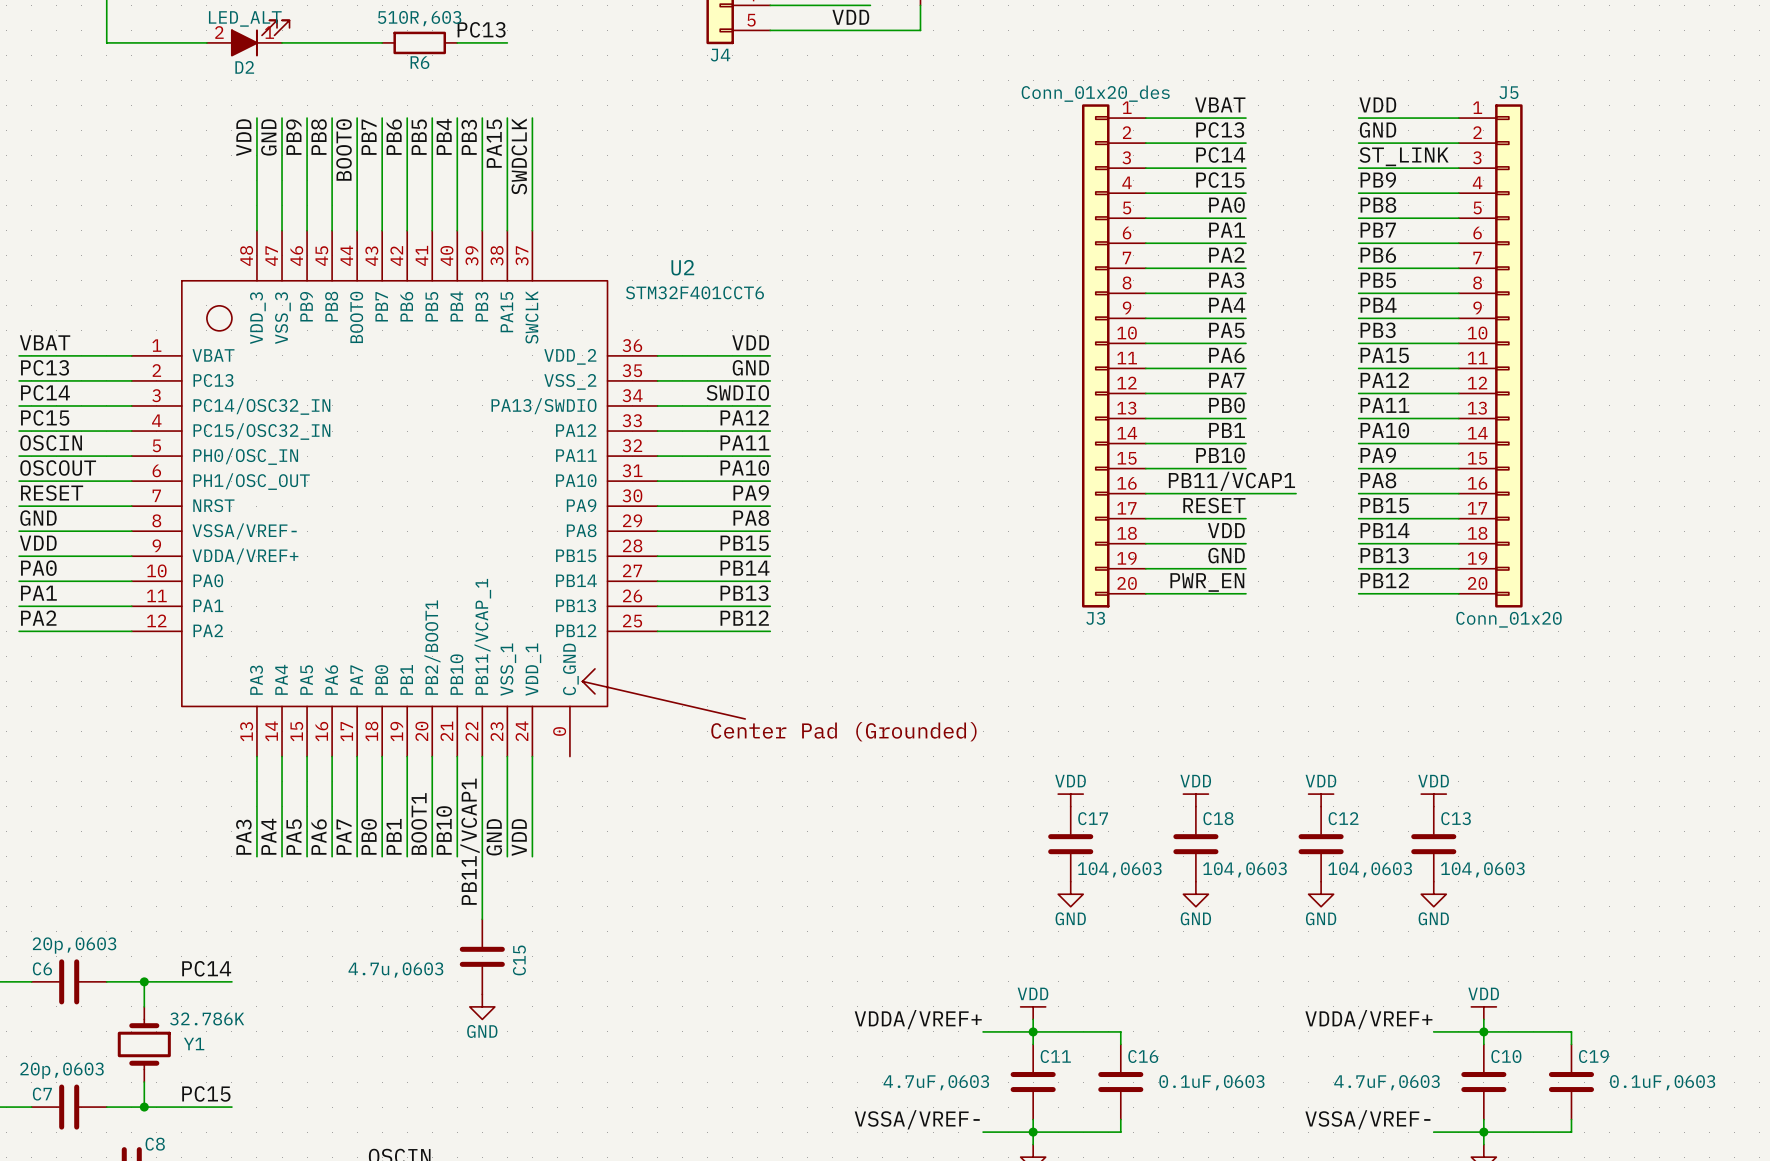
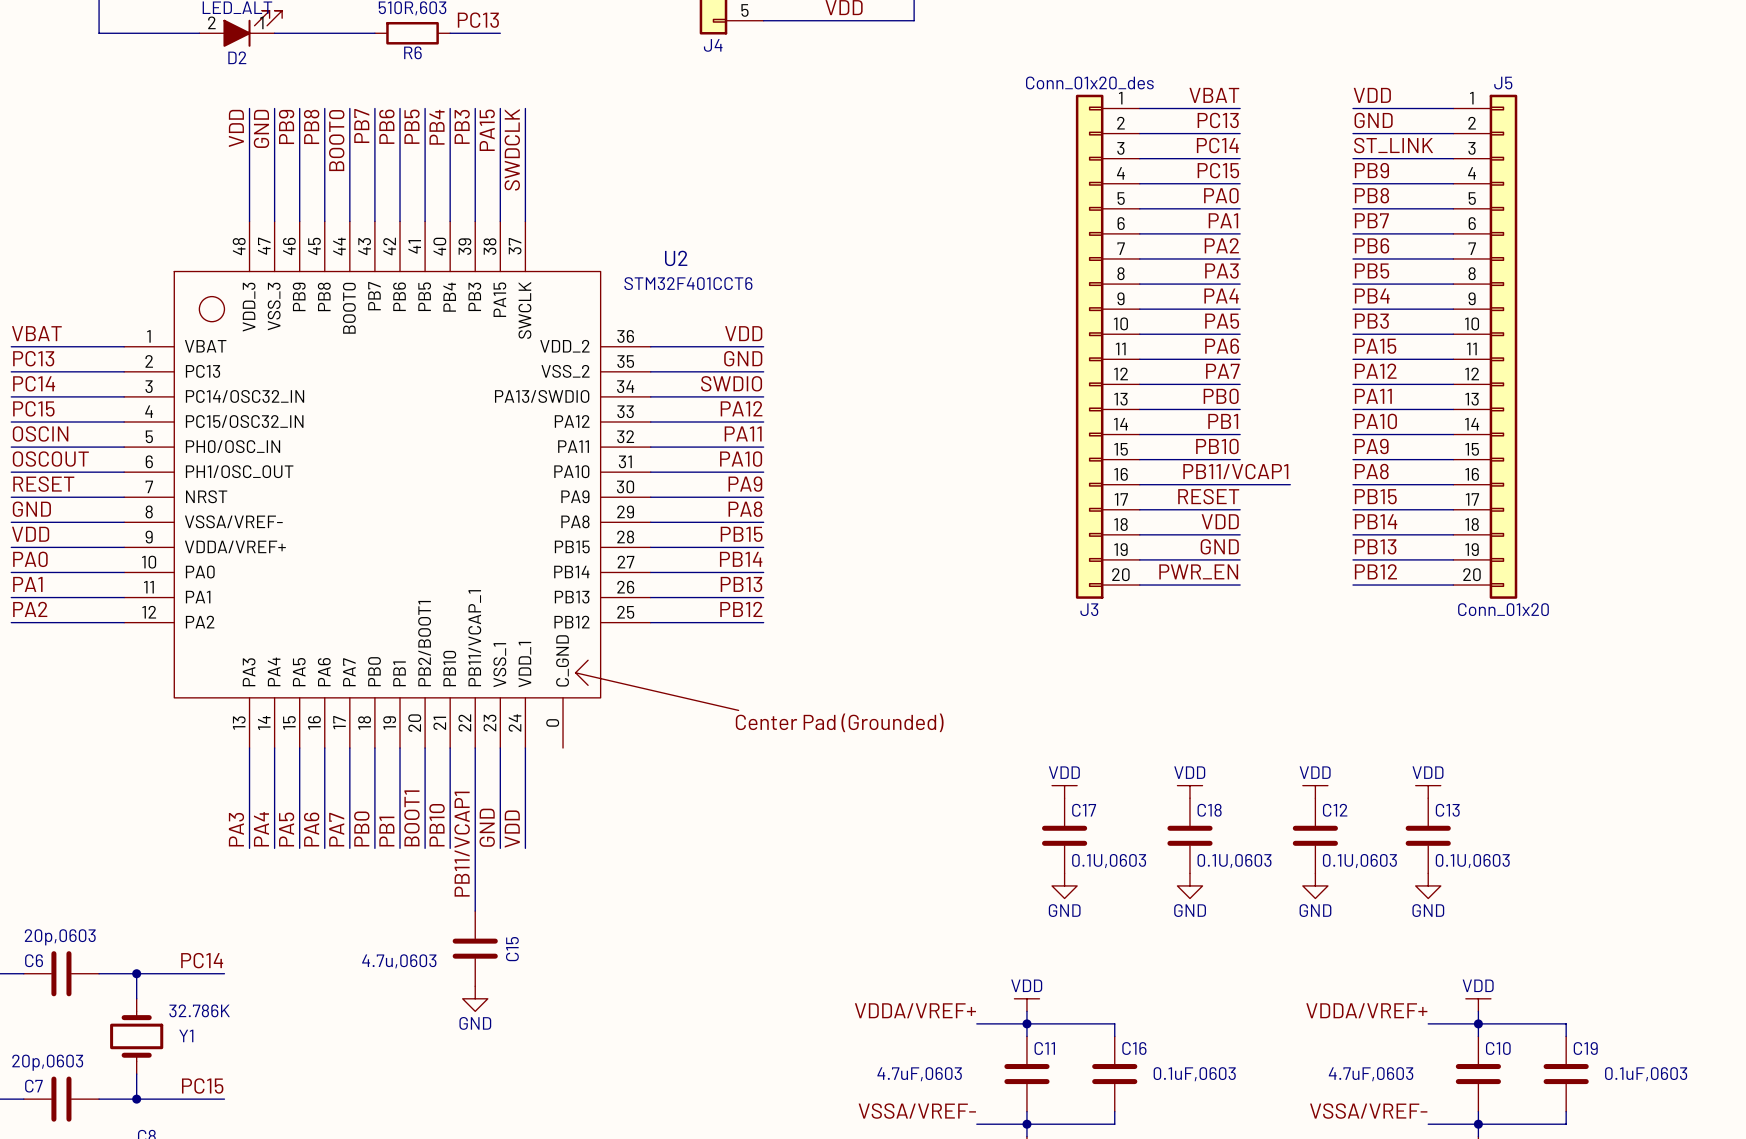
C17 value: 104,0603 (1119, 869) -> 0.1U,0603 (1109, 861)
C18 value: 104,0603 (1244, 869) -> 0.1U,0603 (1234, 861)
C12 value: 104,0603 (1370, 869) -> 0.1U,0603 (1359, 861)
C13 value: 104,0603 (1482, 869) -> 0.1U,0603 (1472, 861)

